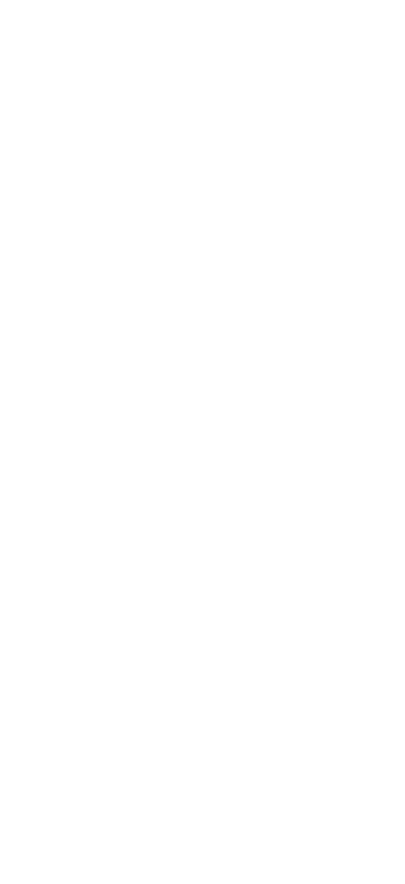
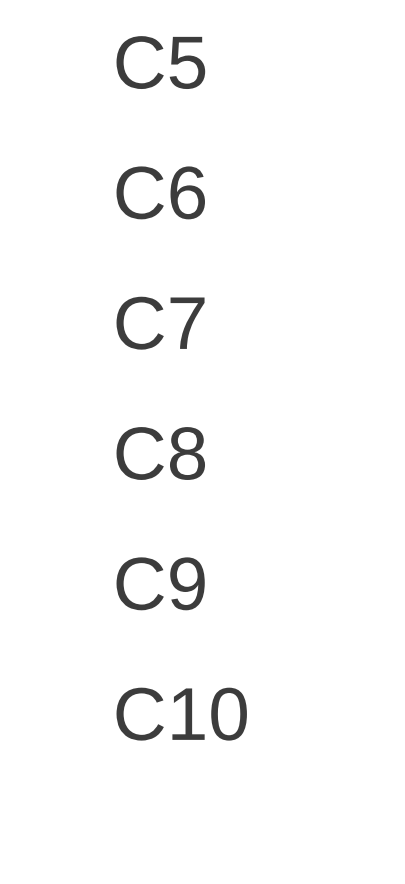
text: none -> C5 (160, 62)
text: none -> C6 (160, 192)
text: none -> C7 (160, 323)
text: none -> C8 (160, 453)
text: none -> C9 (160, 583)
text: none -> C10 (181, 714)

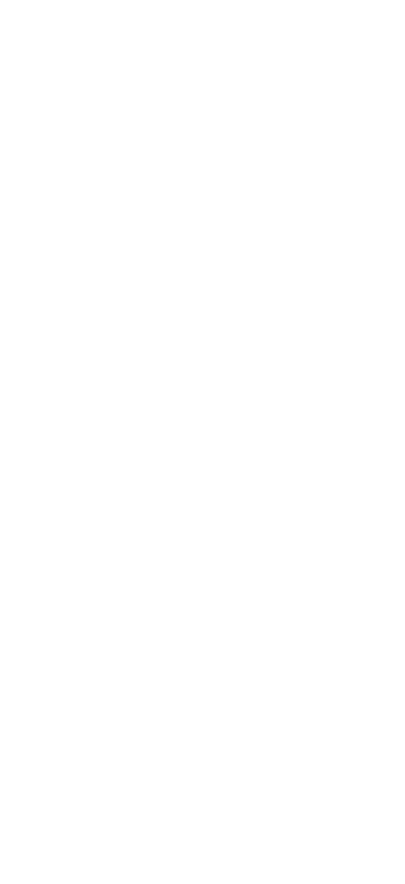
text: C5 (160, 62) -> none
text: C6 (160, 192) -> none
text: C7 (160, 323) -> none
text: C8 (160, 453) -> none
text: C9 (160, 583) -> none
text: C10 (181, 714) -> none

